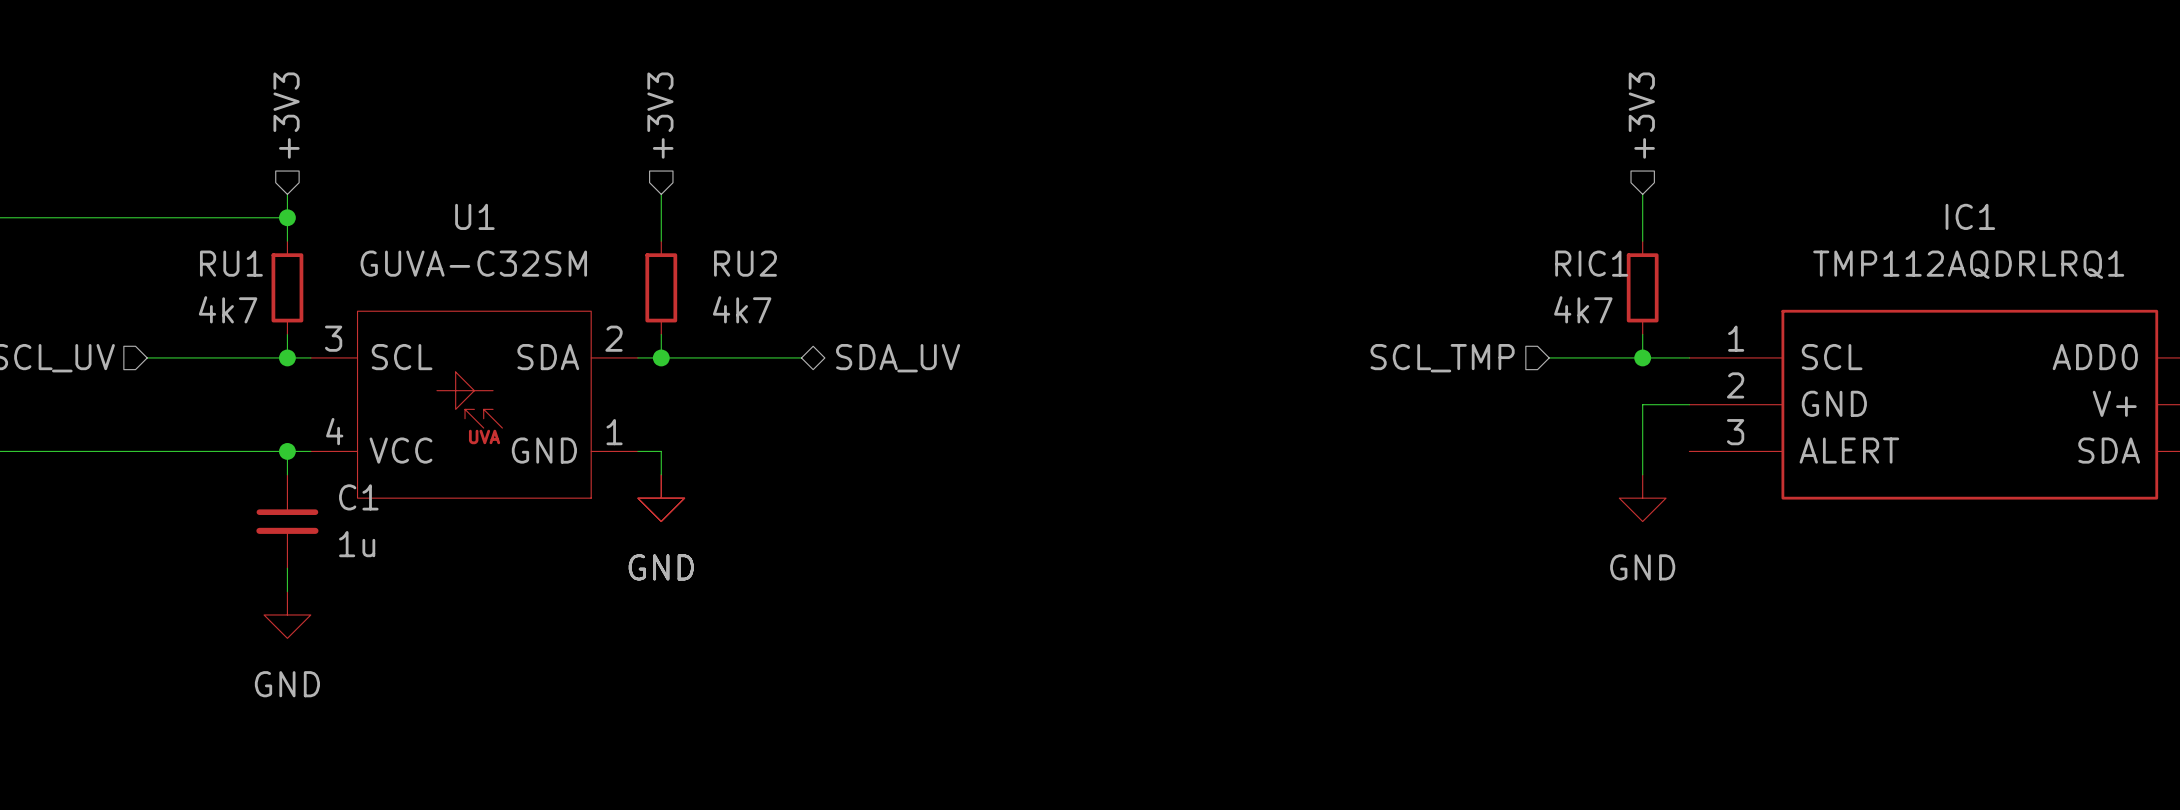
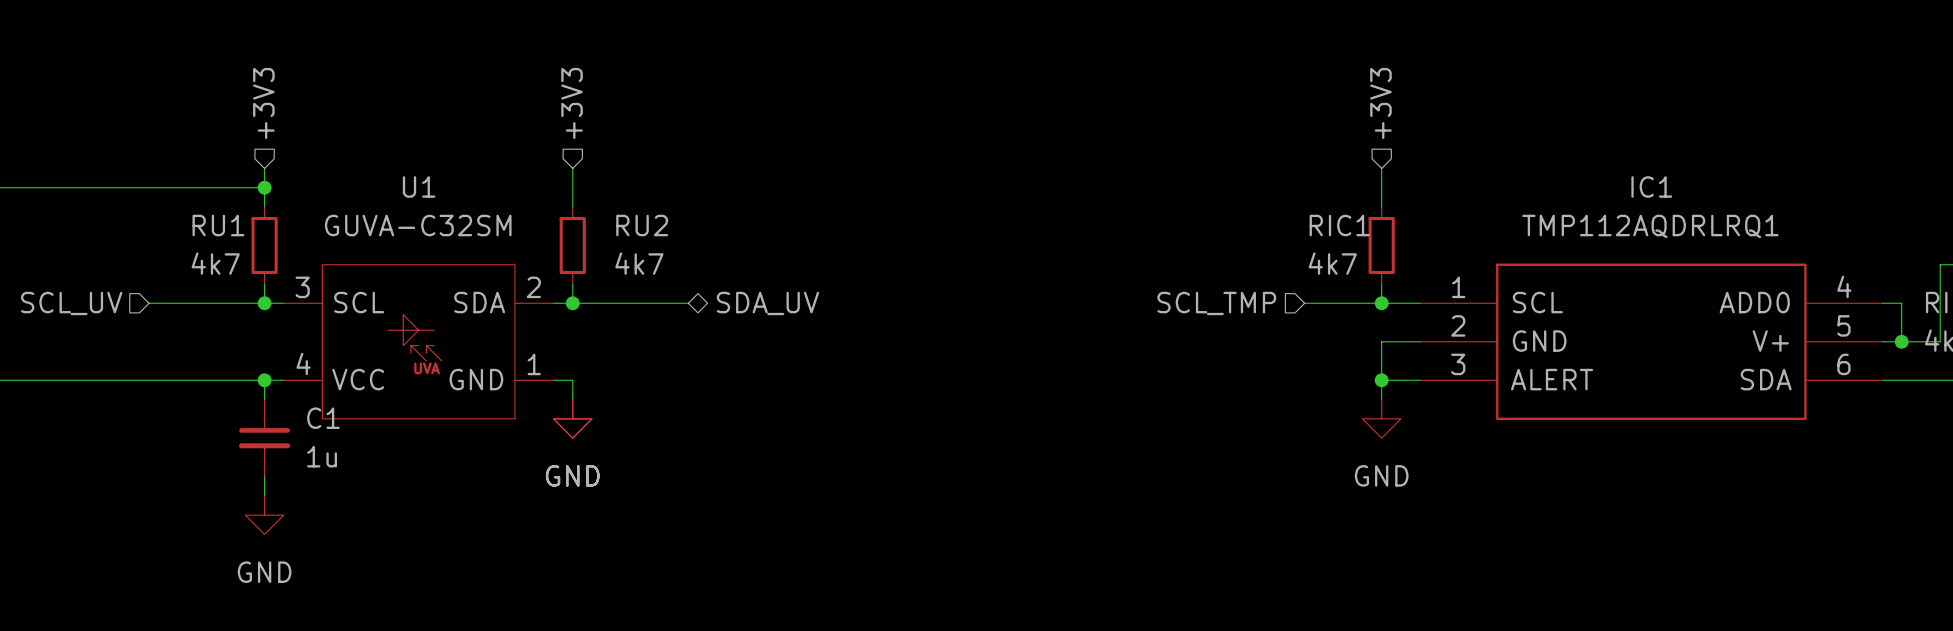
wire: none -> (1381, 380) (1420, 380)
junction: none -> (1381, 380)

